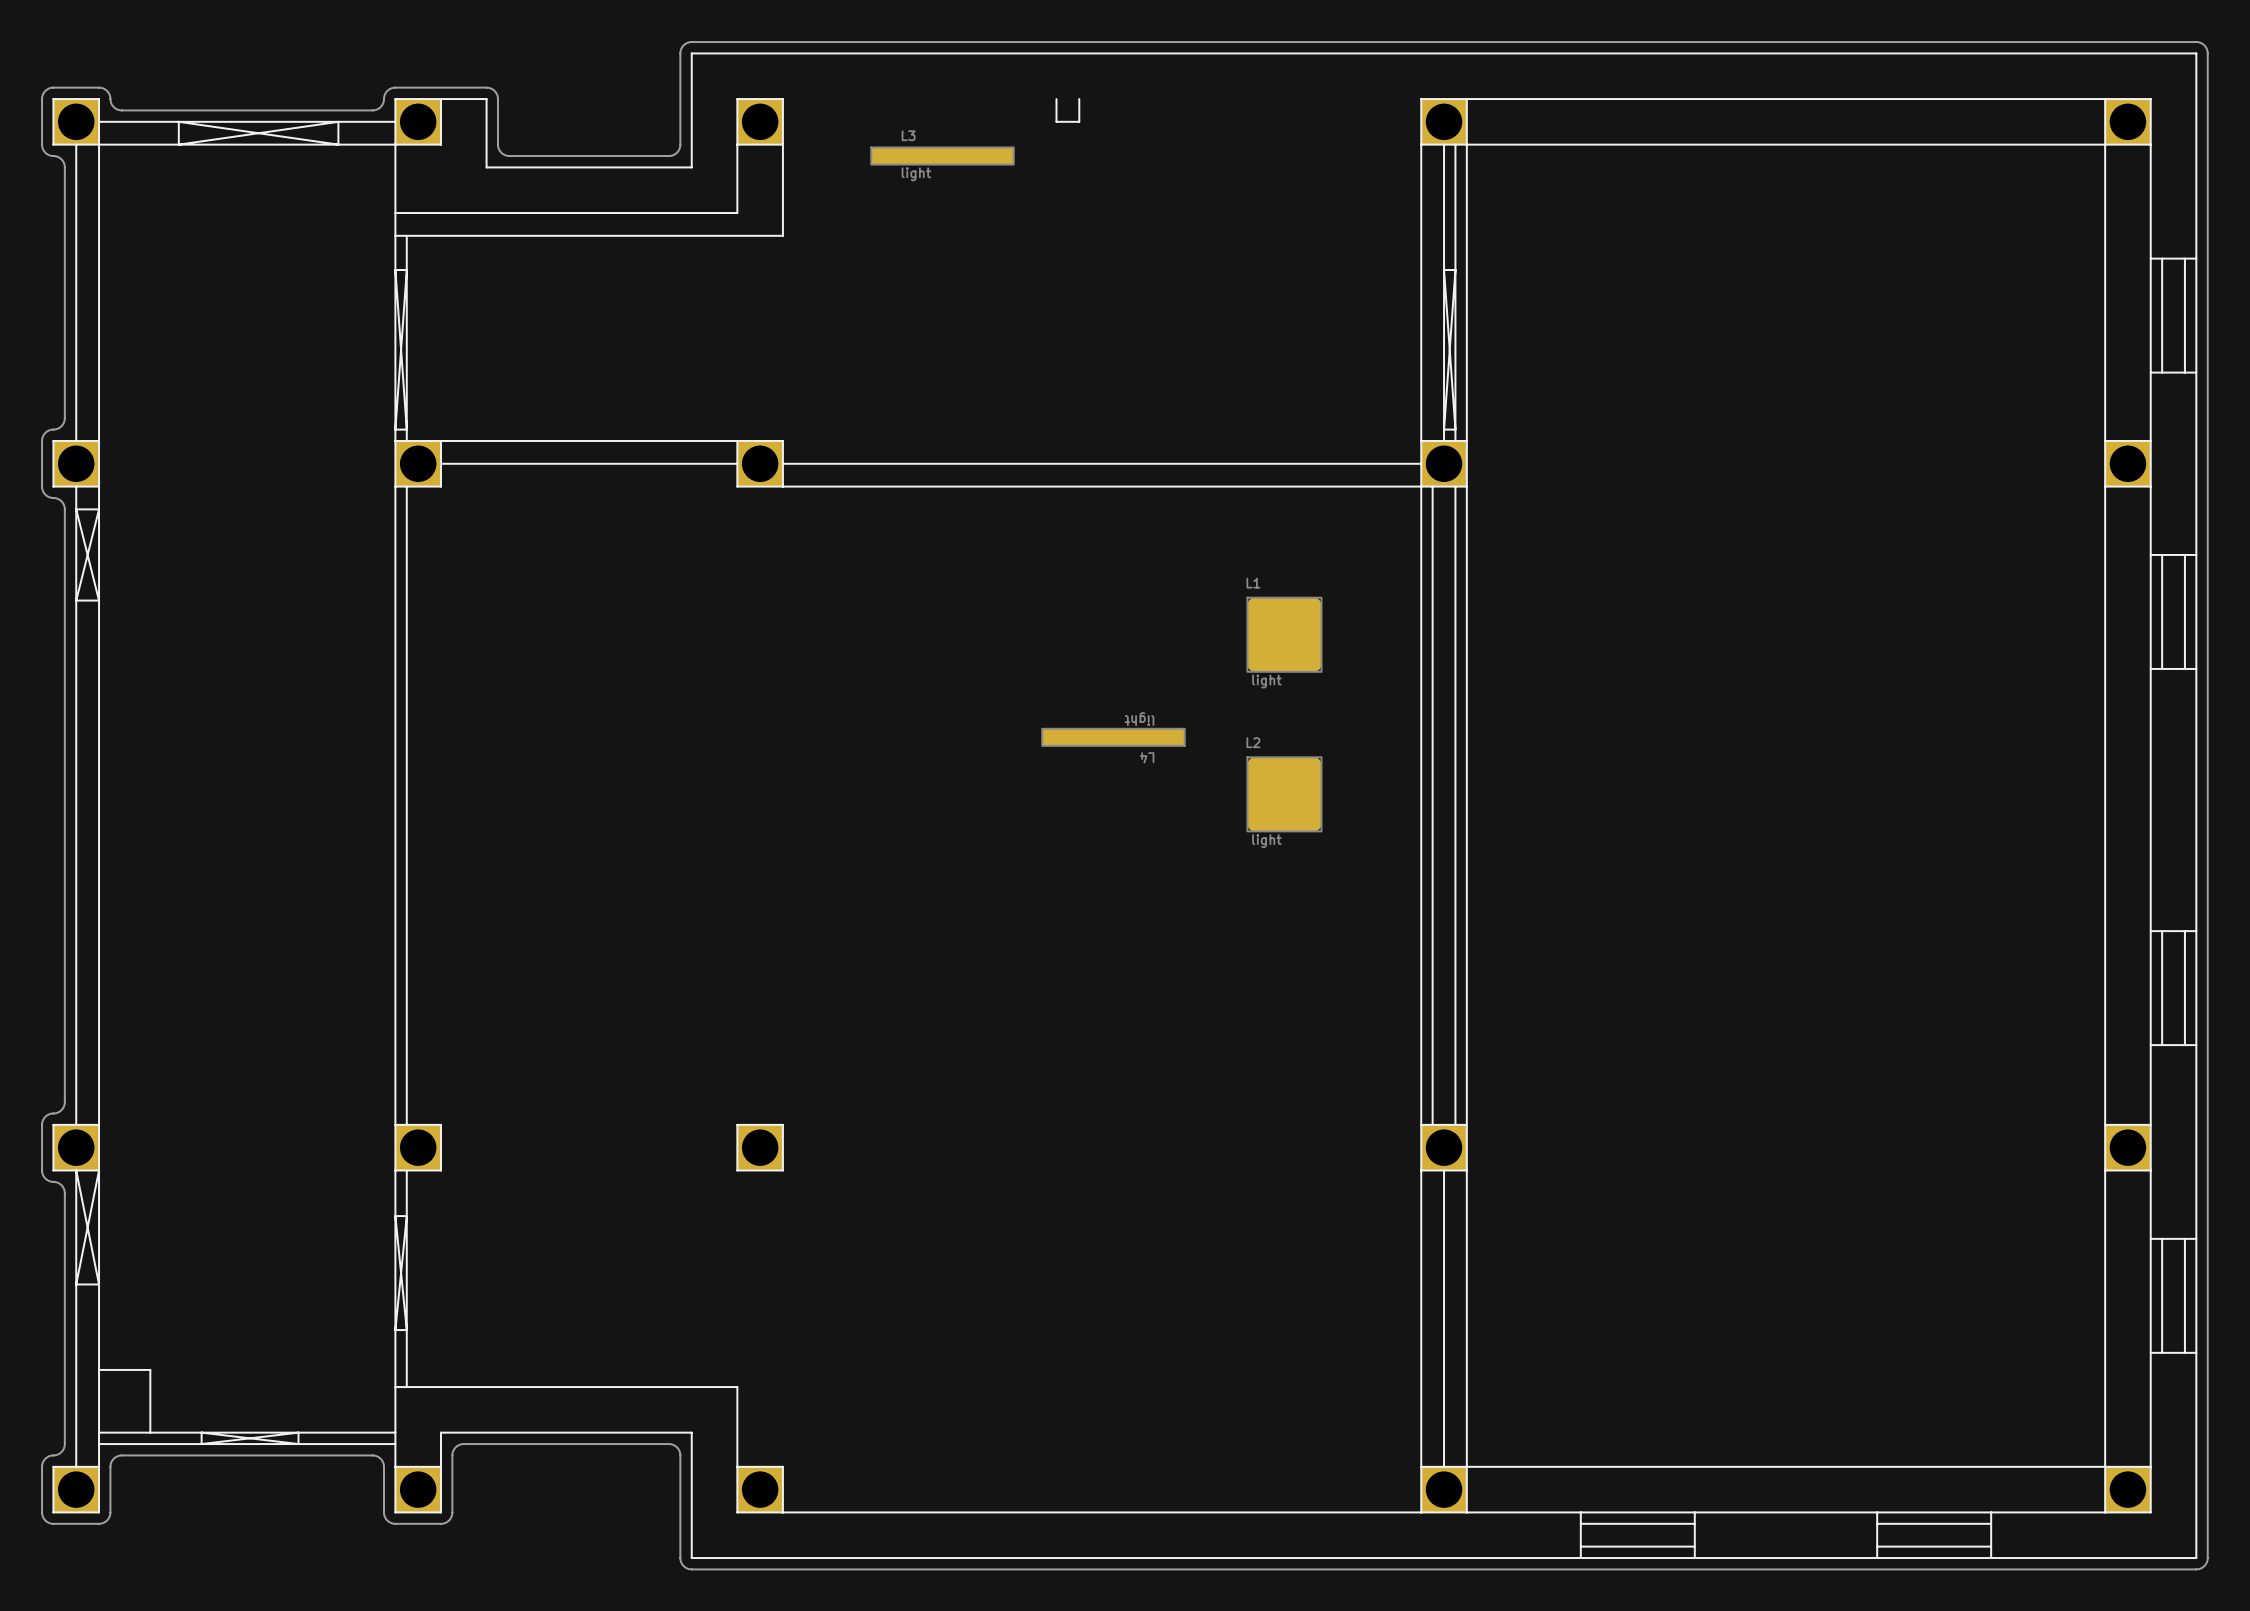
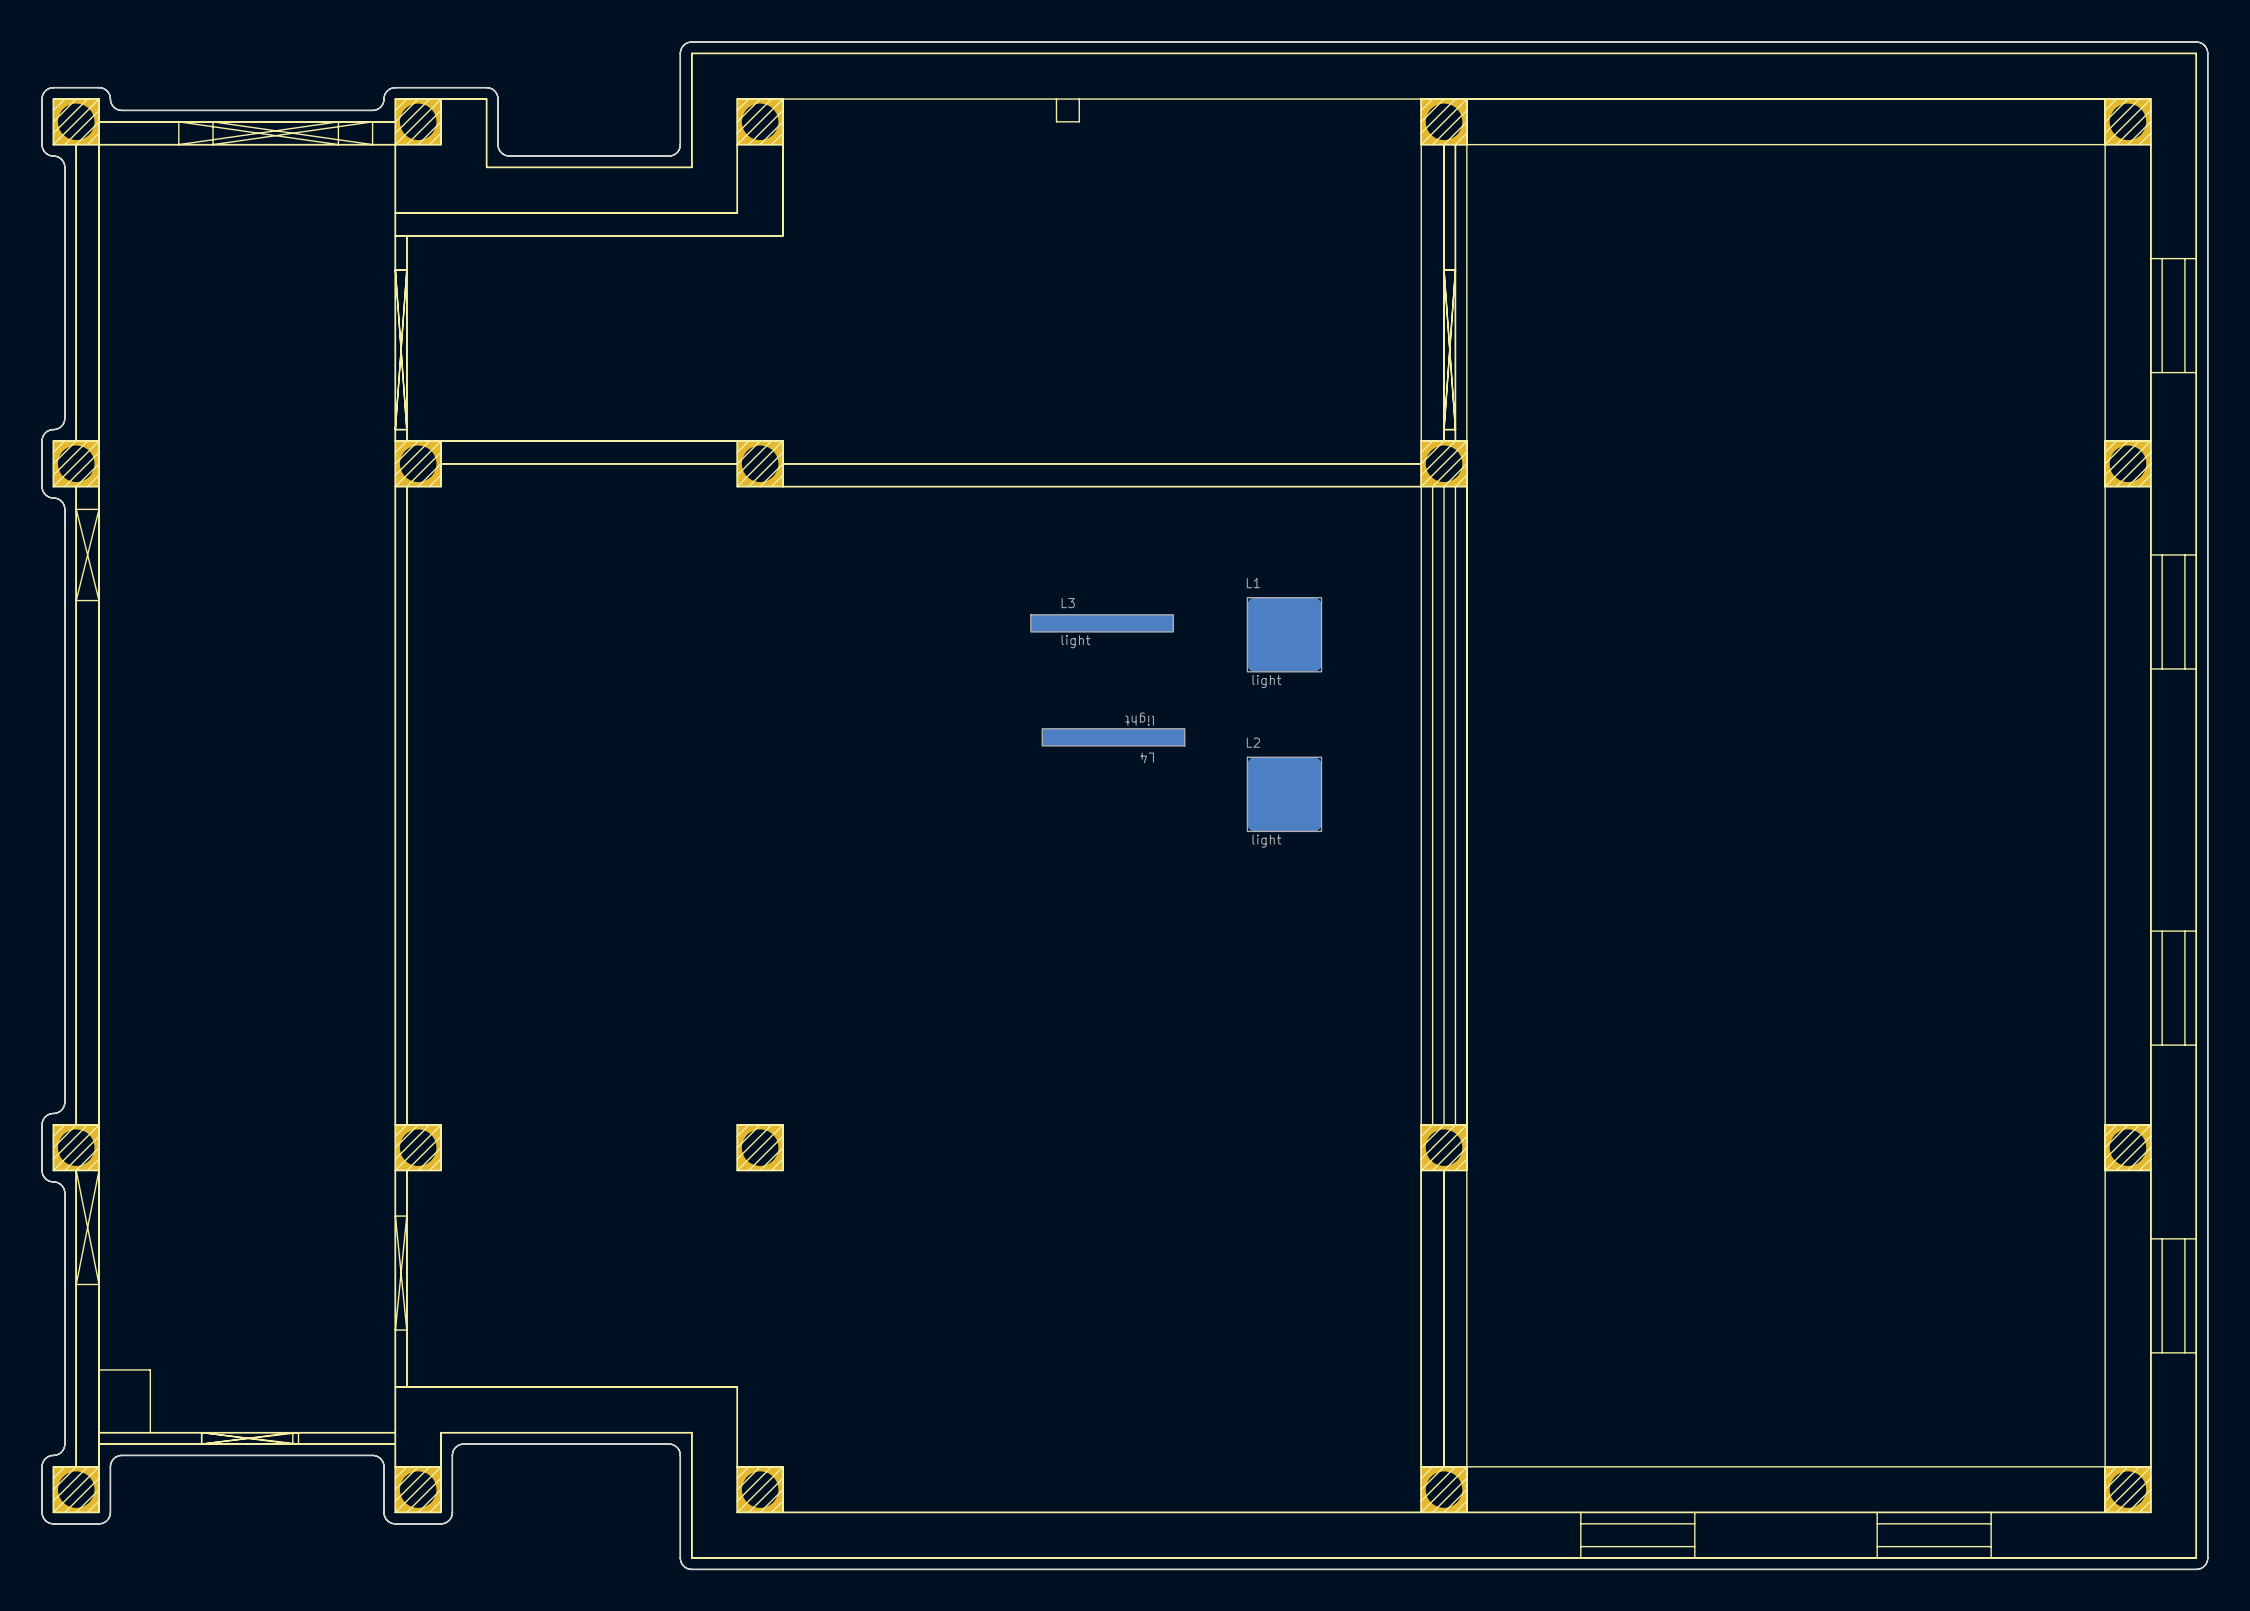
drawing: none -> [41, 41, 2209, 1571]
L3 position: (942, 156) -> (1102, 623)

